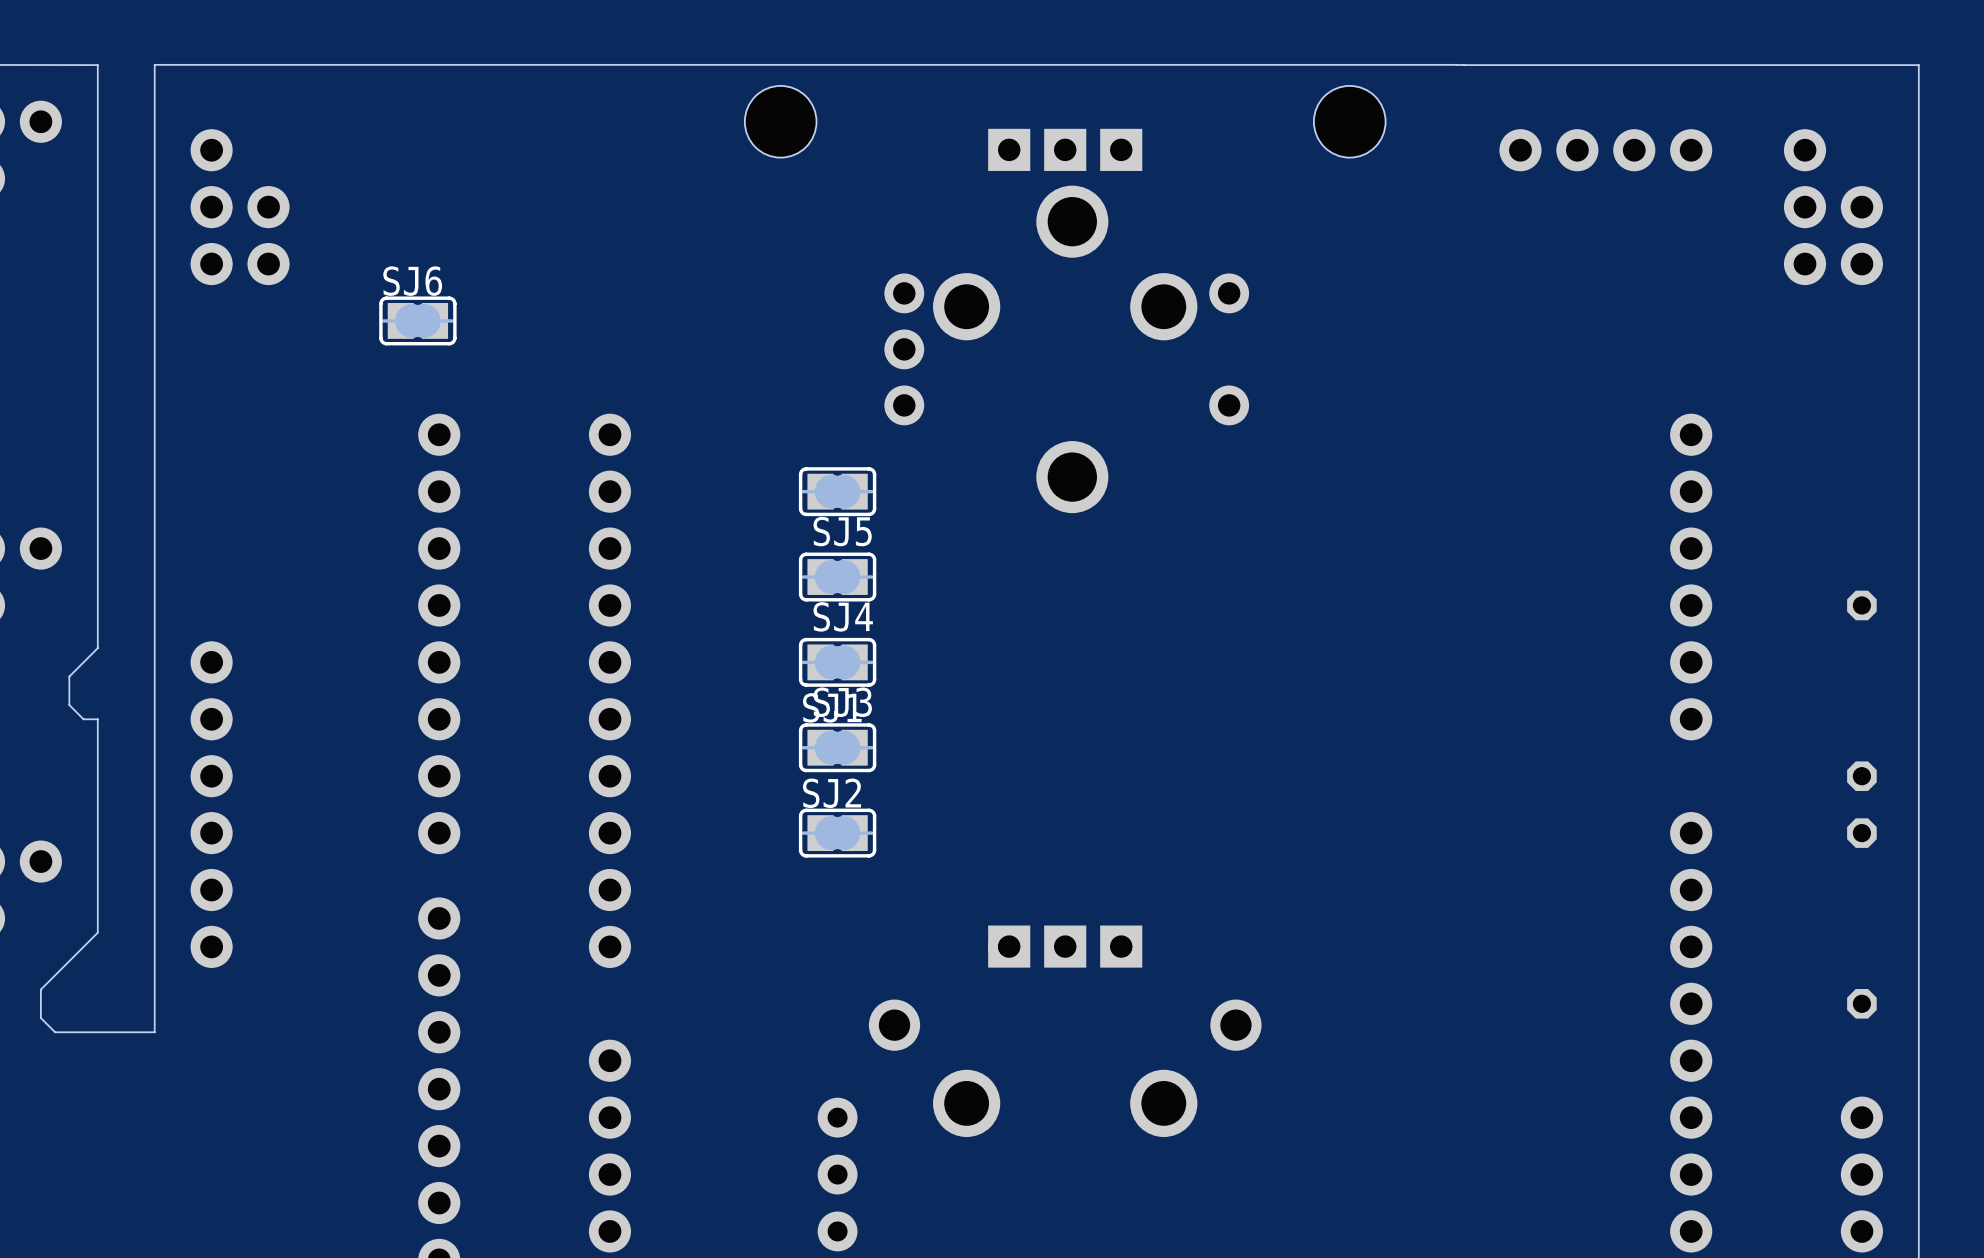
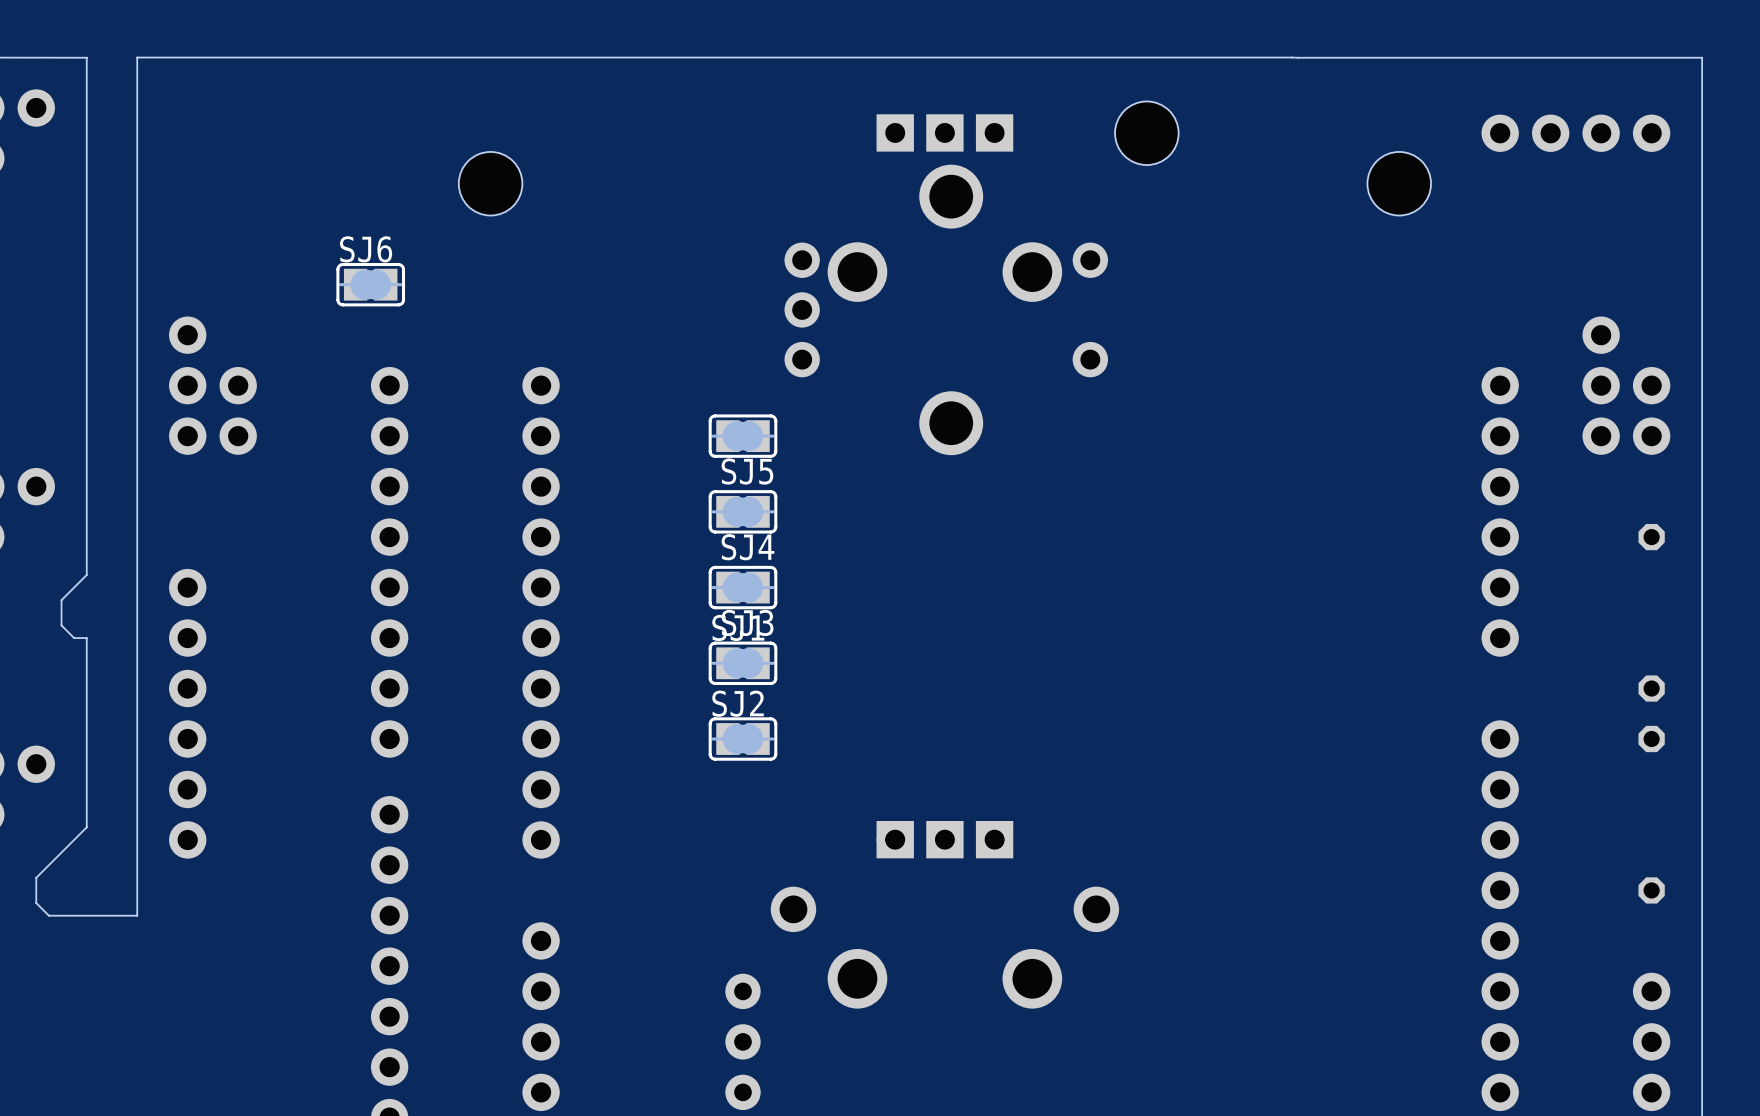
hole position: (780, 121) -> (490, 183)
hole position: (1349, 121) -> (1146, 133)
part: (1548, 150) -> none
part position: (1662, 150) -> (1525, 133)
part: none -> (1626, 133)
part position: (240, 207) -> (212, 385)
hole: none -> (1399, 183)
part position: (1833, 207) -> (1626, 385)

